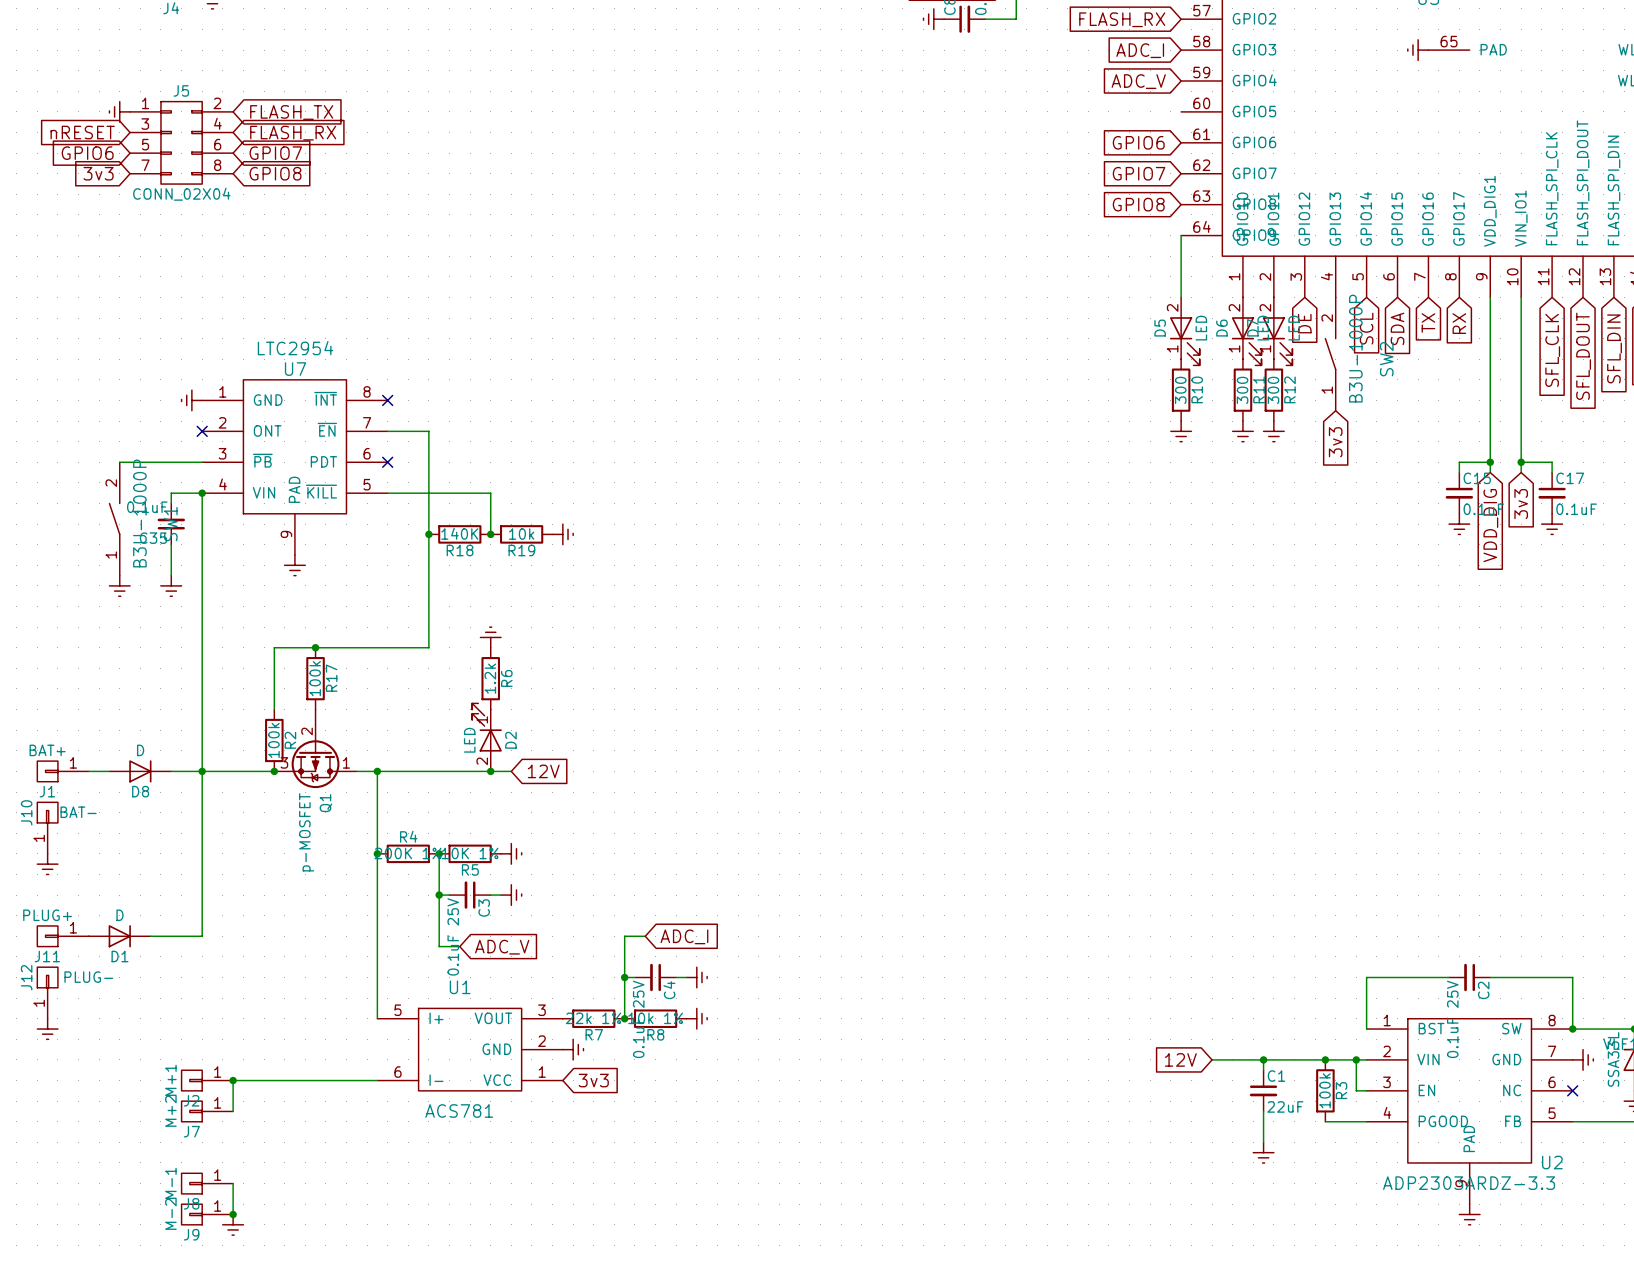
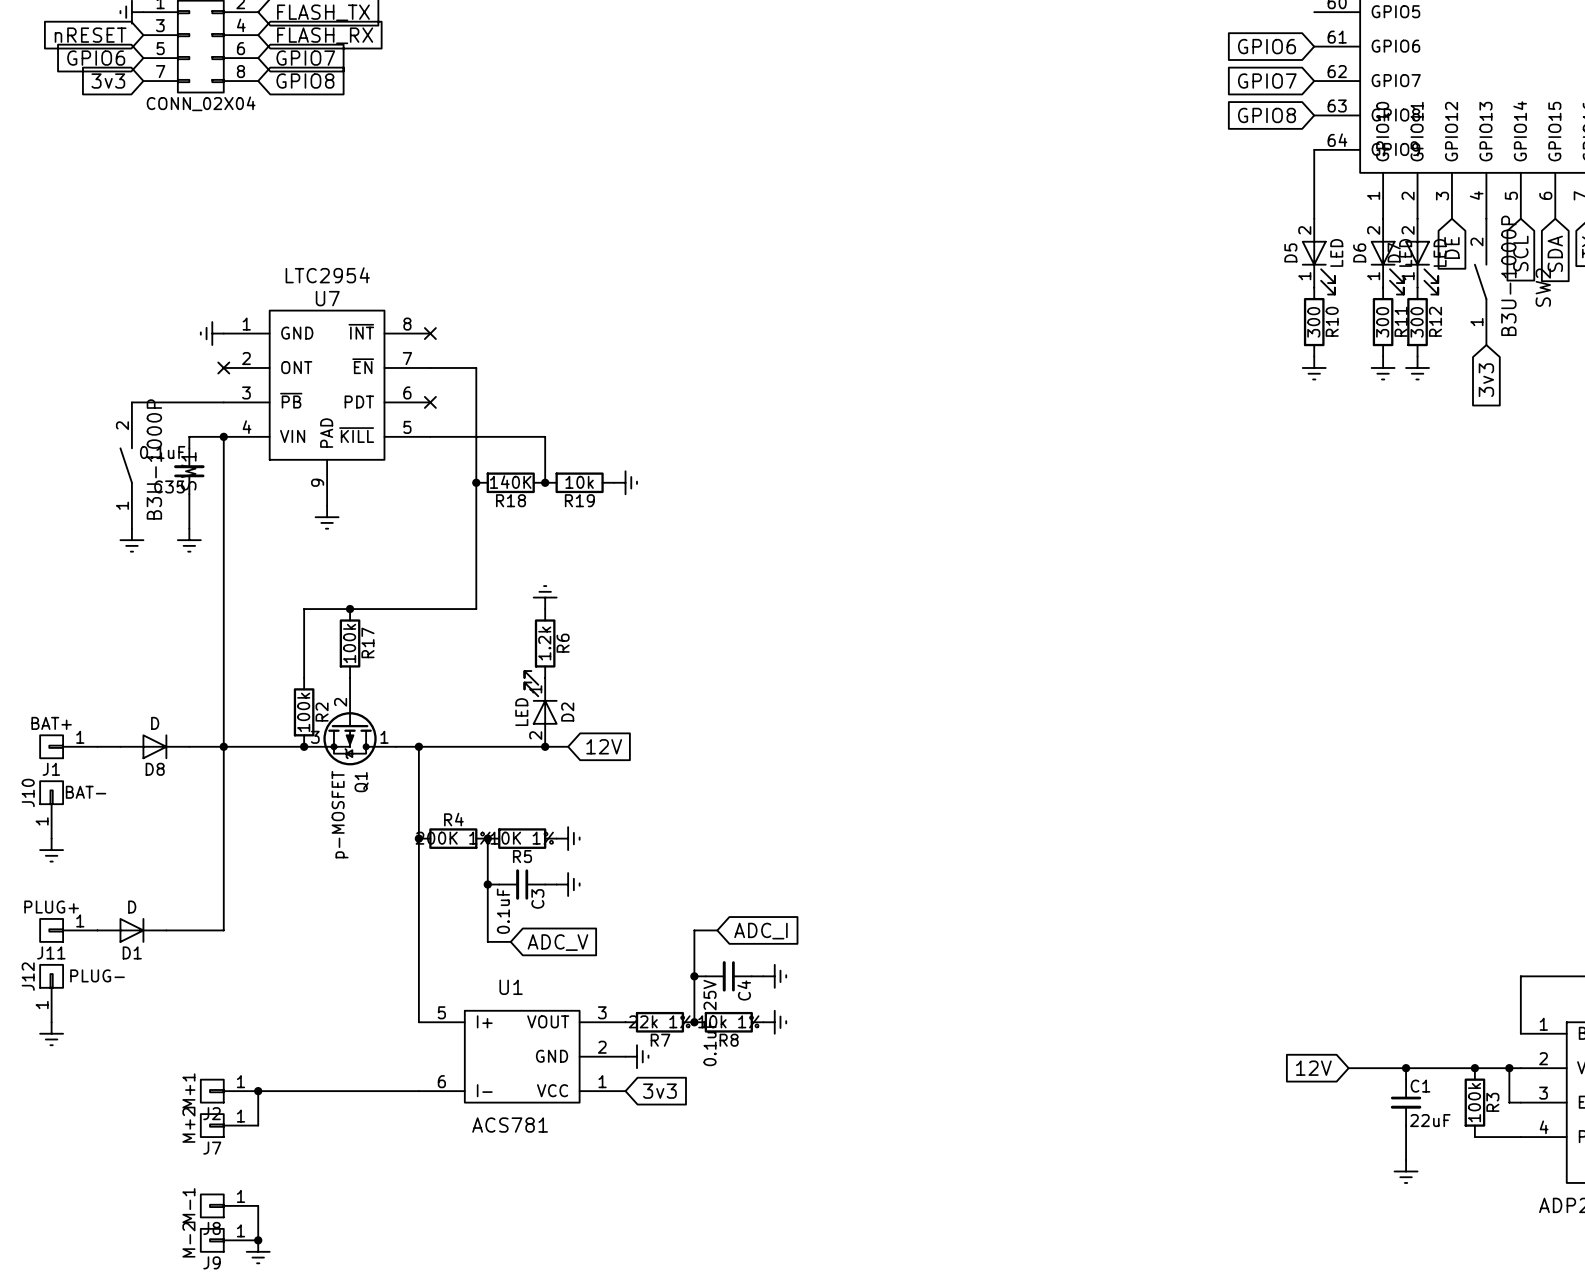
C3 value: 0.1uF 25V (453, 936) -> 0.1uF (503, 911)

